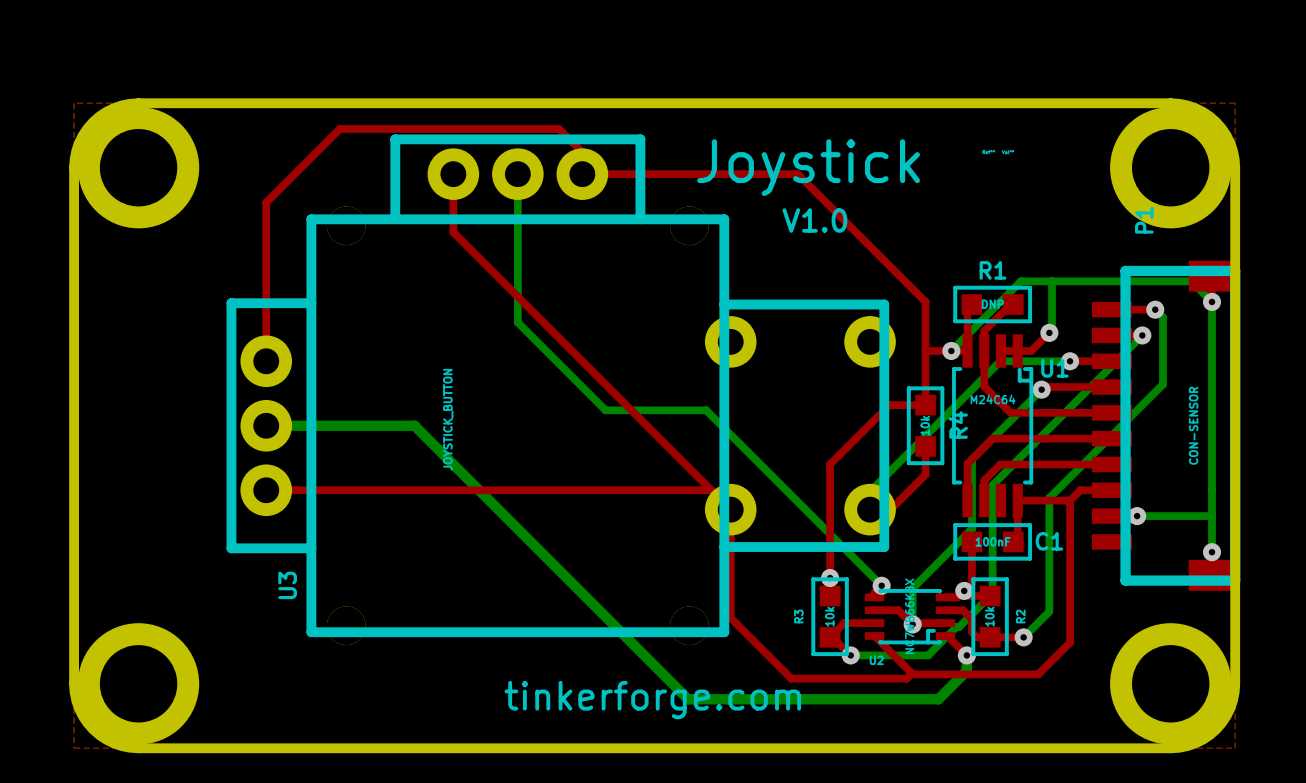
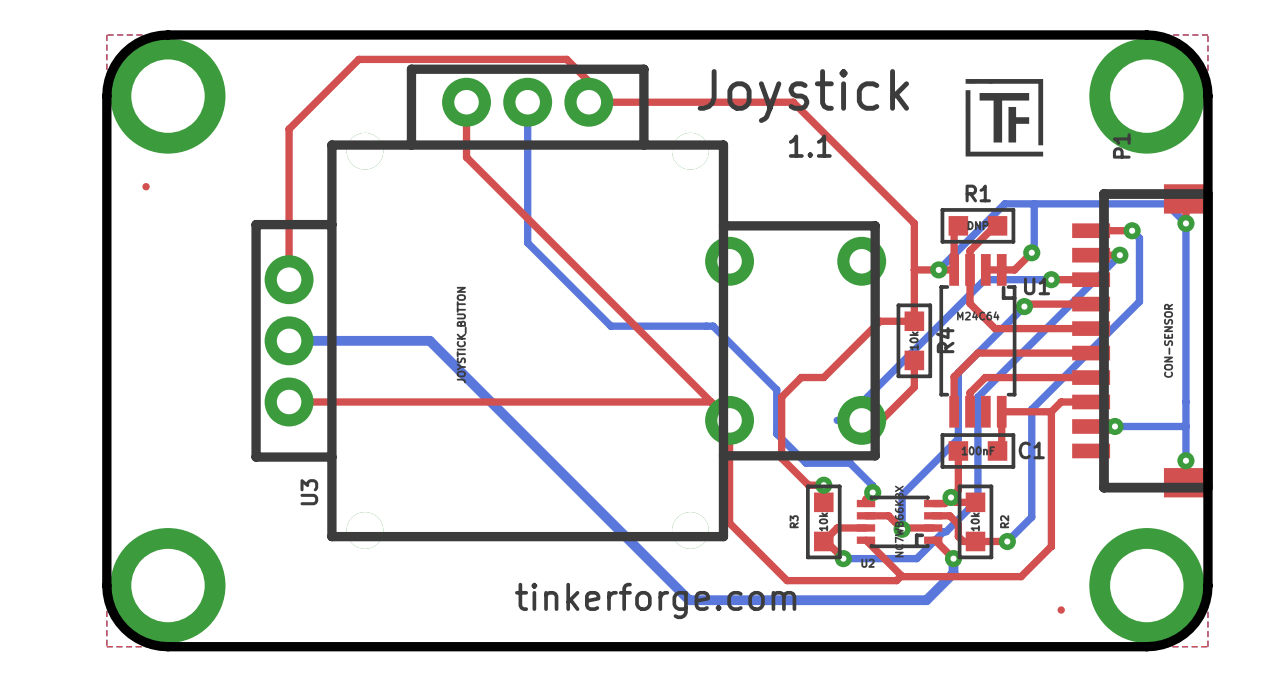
drawing: none -> [965, 79, 1044, 157]
text: V1.0 (814, 220) -> 1.1 (810, 146)
part: none -> (146, 186)
bottom track: (1000, 361) (870, 491) (870, 509) -> (984, 279) (844, 420) (837, 420)
bottom track: (706, 410) (881, 585) -> (706, 326) (713, 326) (776, 389) (776, 433) (806, 463) (850, 463) (872, 485) (872, 492)
top track: (830, 464) (830, 578) -> (823, 377) (801, 377) (781, 397) (781, 458) (808, 485) (823, 485)
part: none -> (1061, 610)

